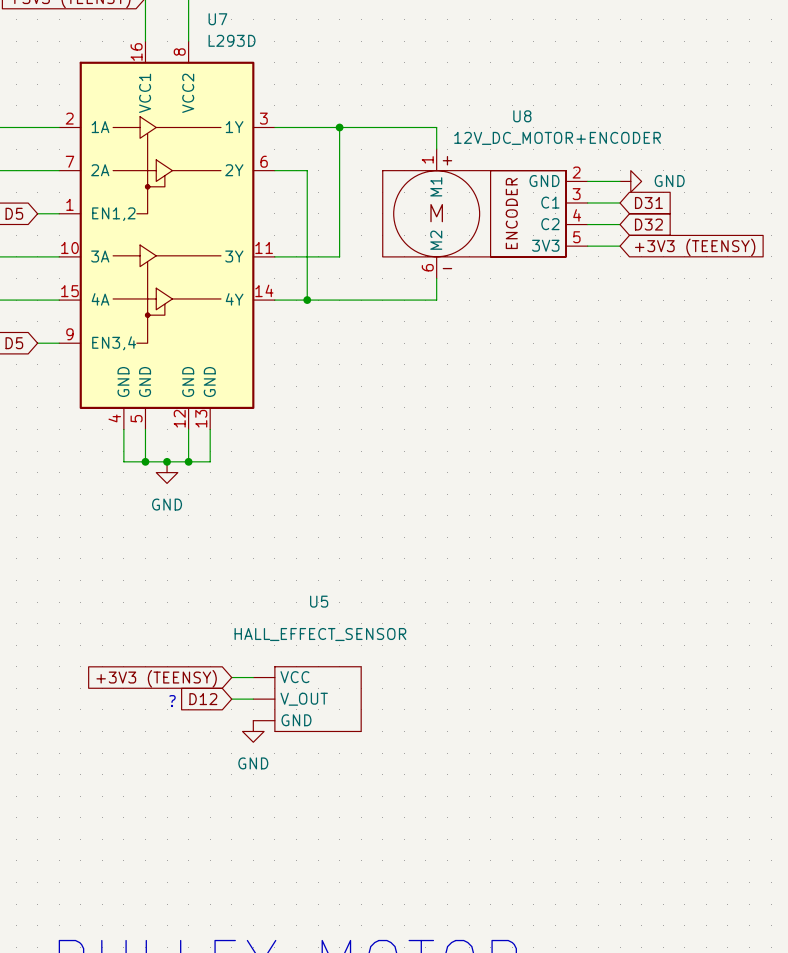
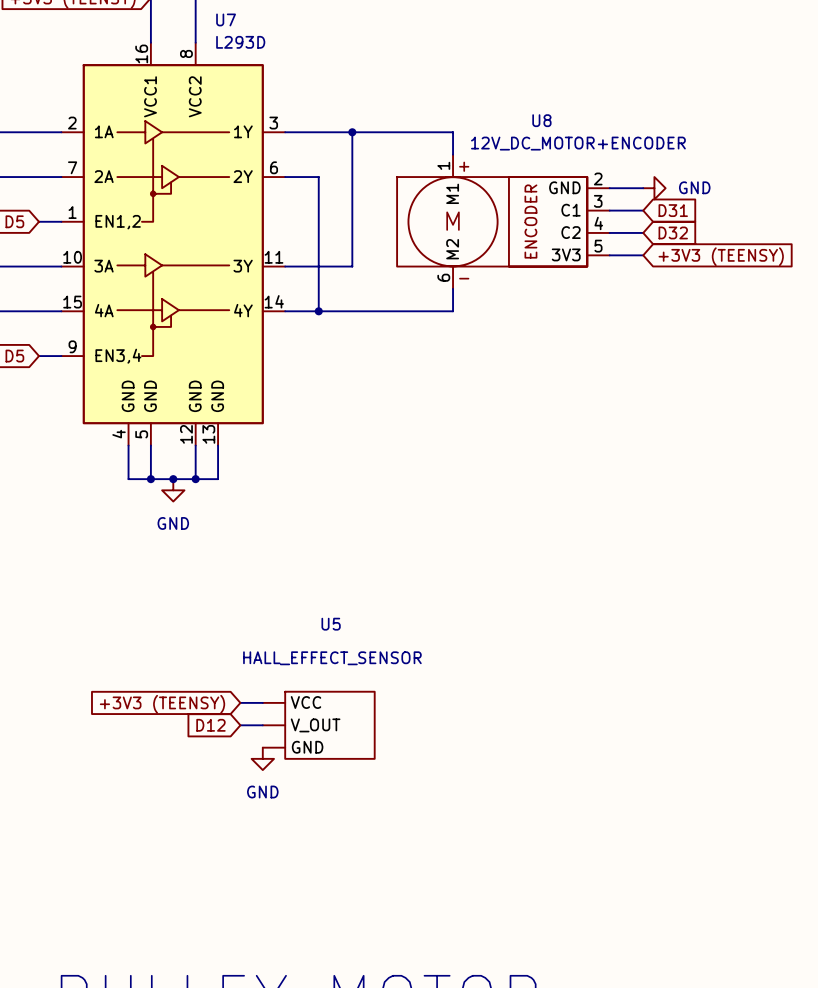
text: ? (172, 701) -> none

